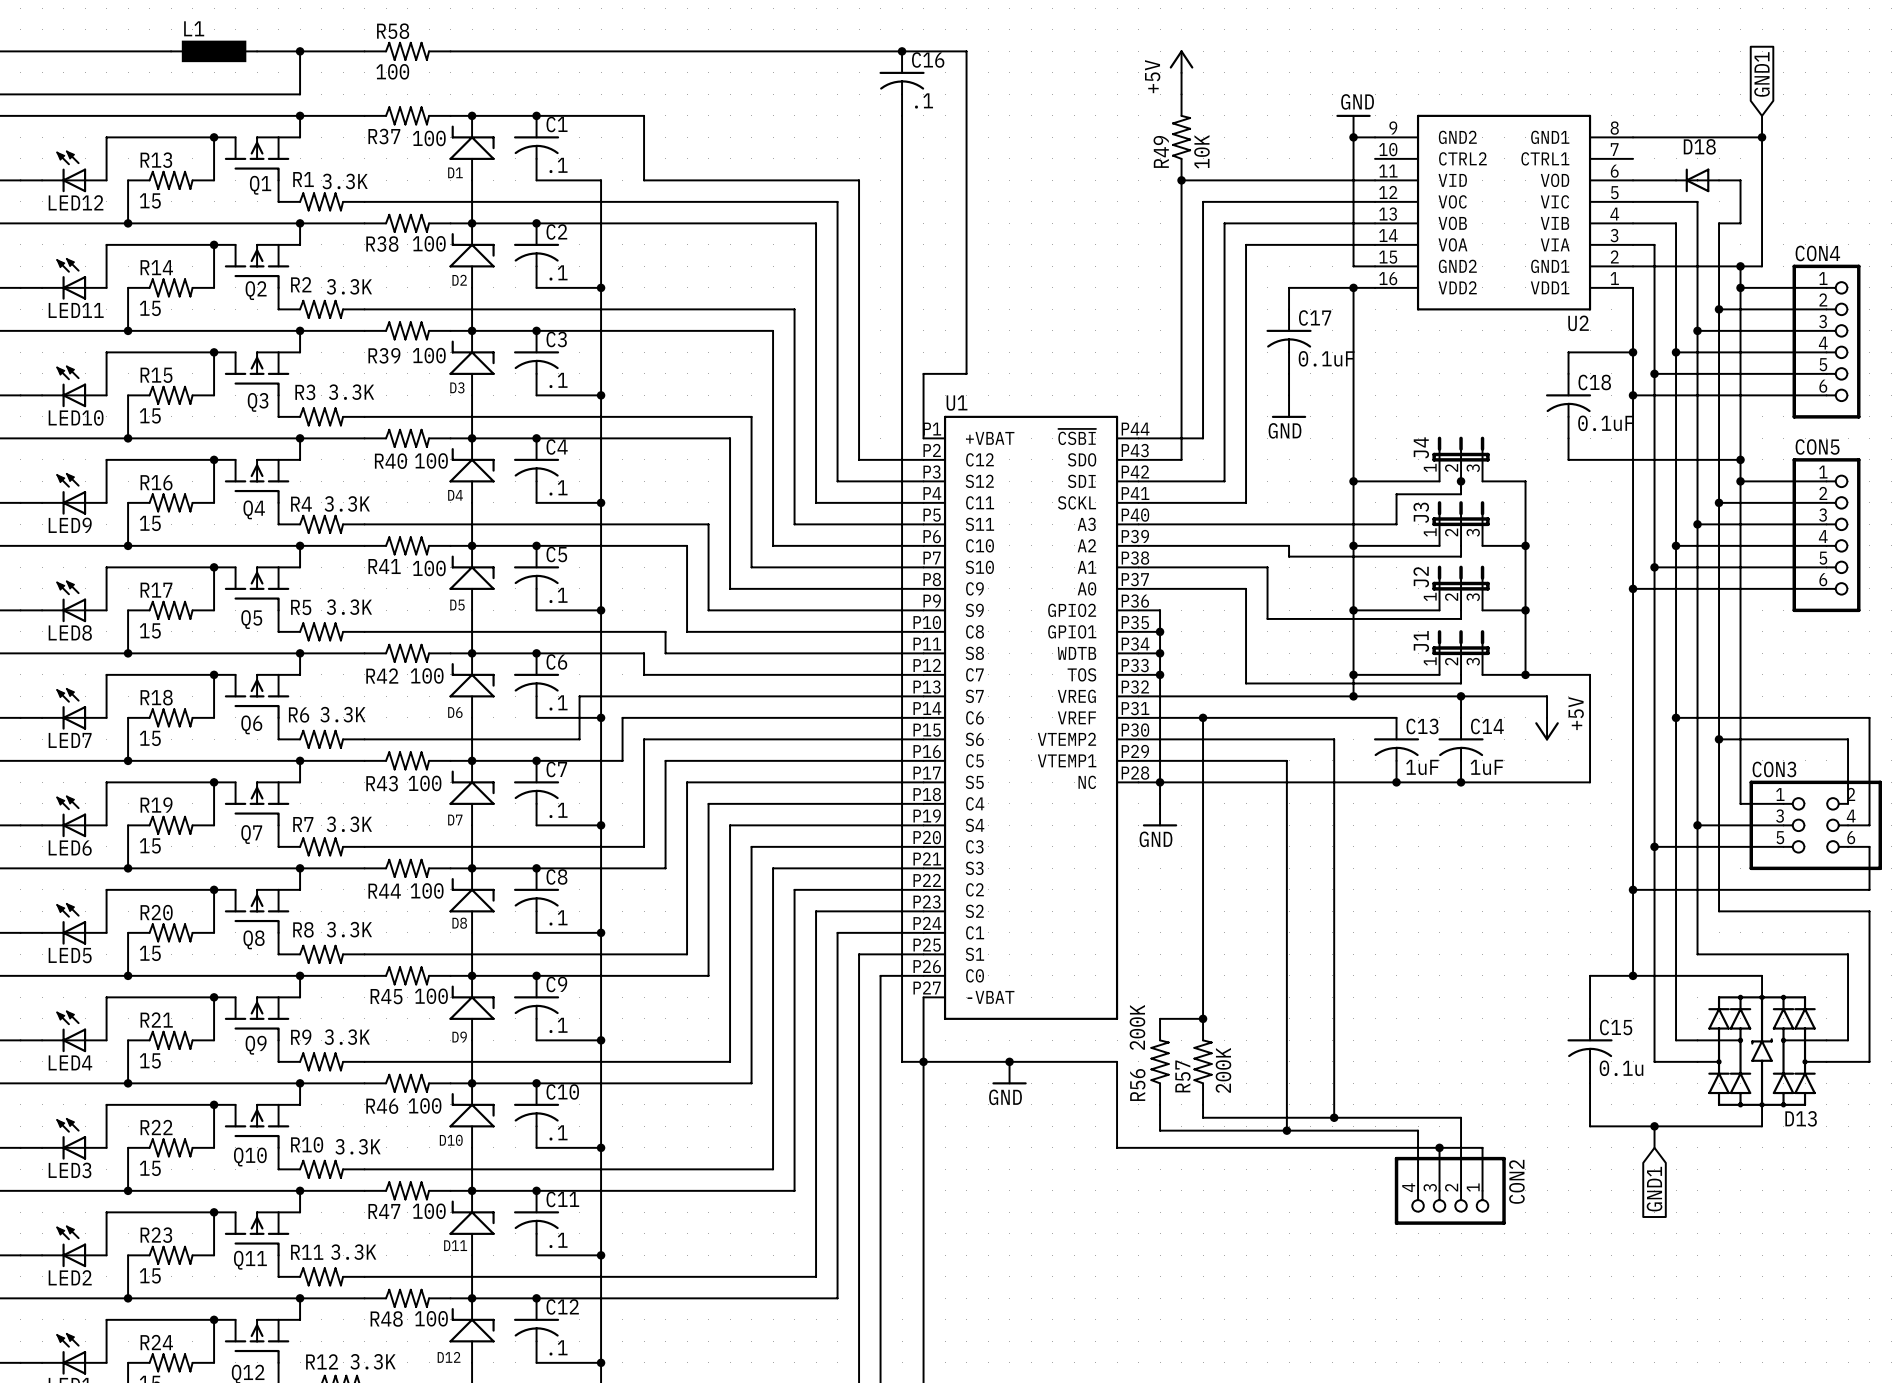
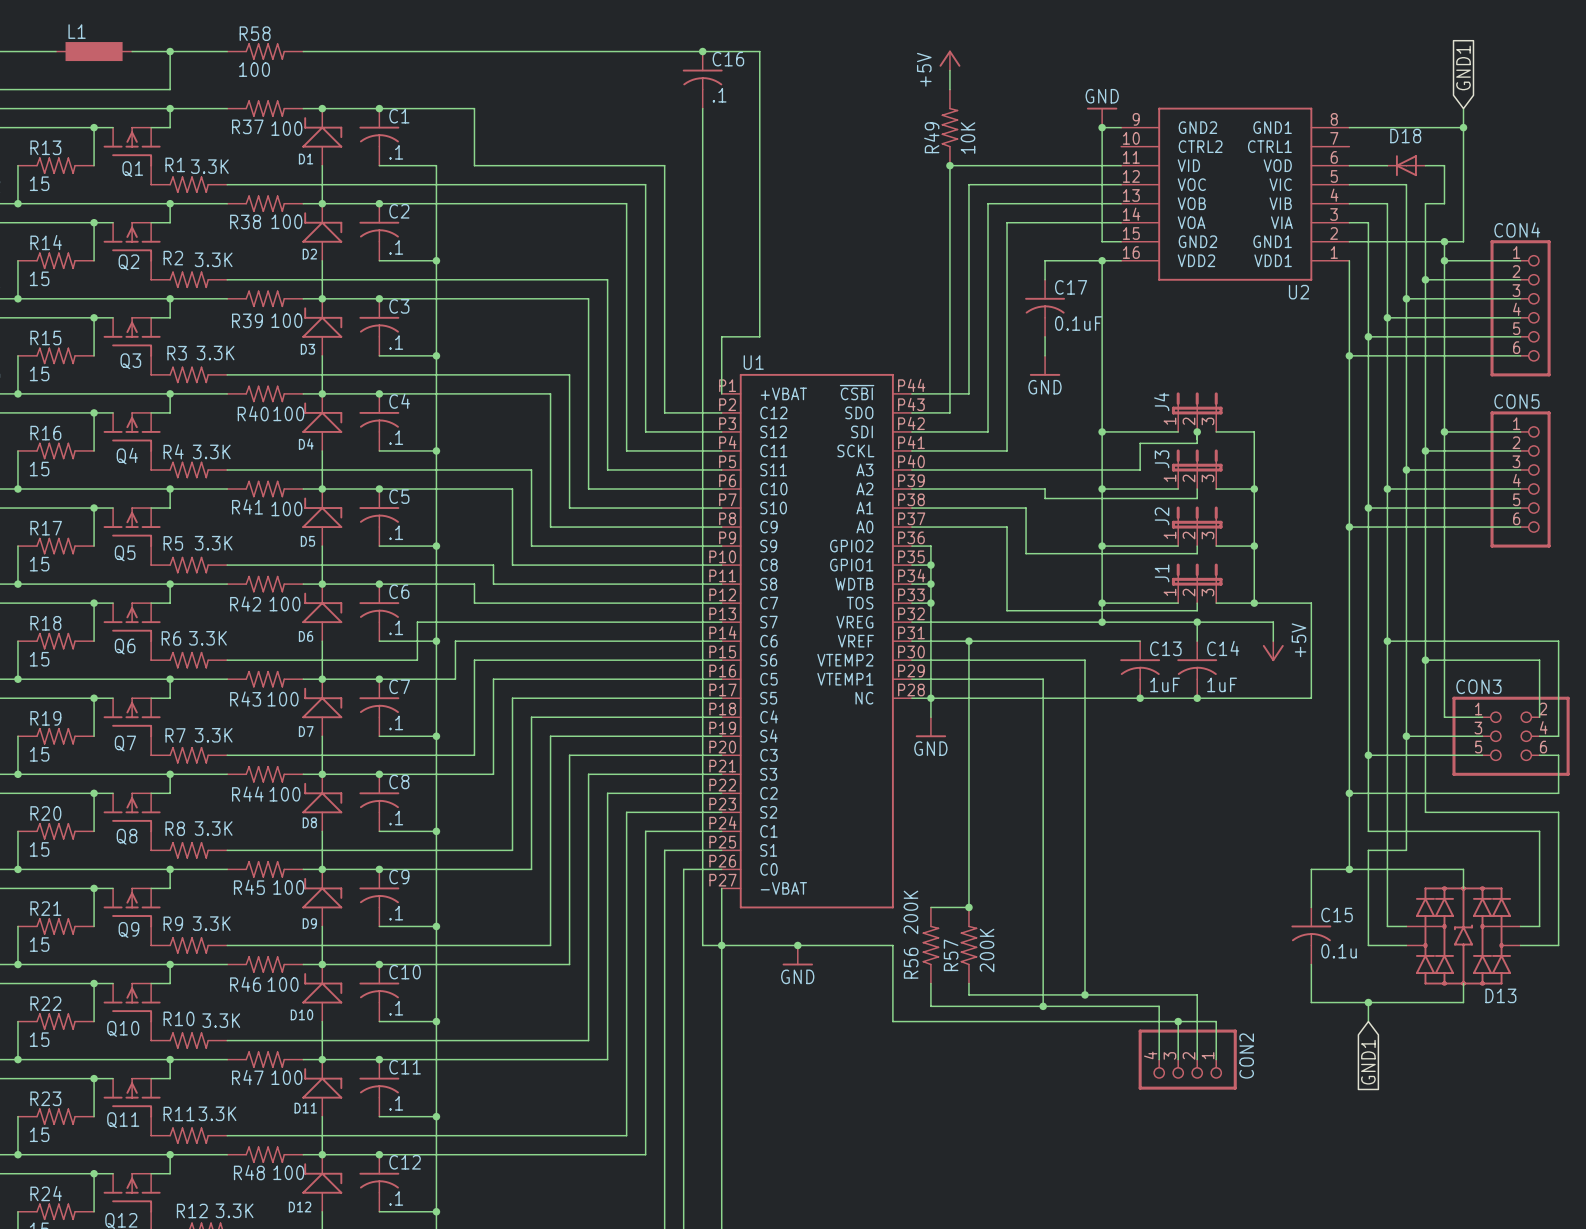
wire: (1633, 352) (1568, 352) (1568, 373) -> none
junction: (1633, 352) -> none
C18: 0.1uF (1568, 406) -> none
wire: (1568, 438) (1568, 459) (1740, 459) -> none
junction: (1740, 459) -> none
wire: (1654, 932) (1654, 954) -> (1406, 850) (1368, 850)
wire: (1697, 954) (1848, 954) -> (1368, 831) (1539, 831) (1539, 850)

